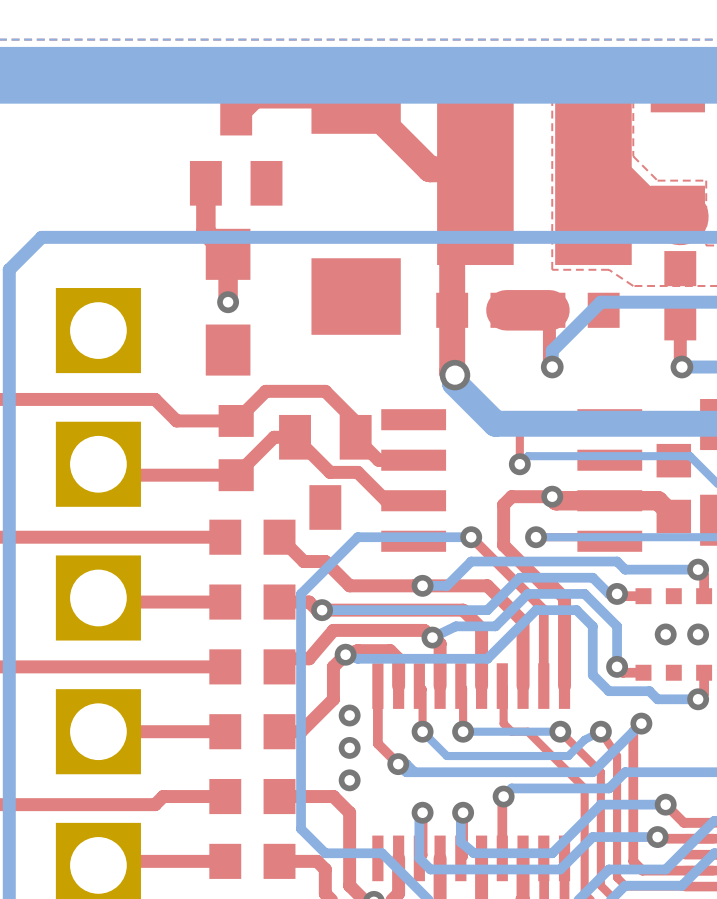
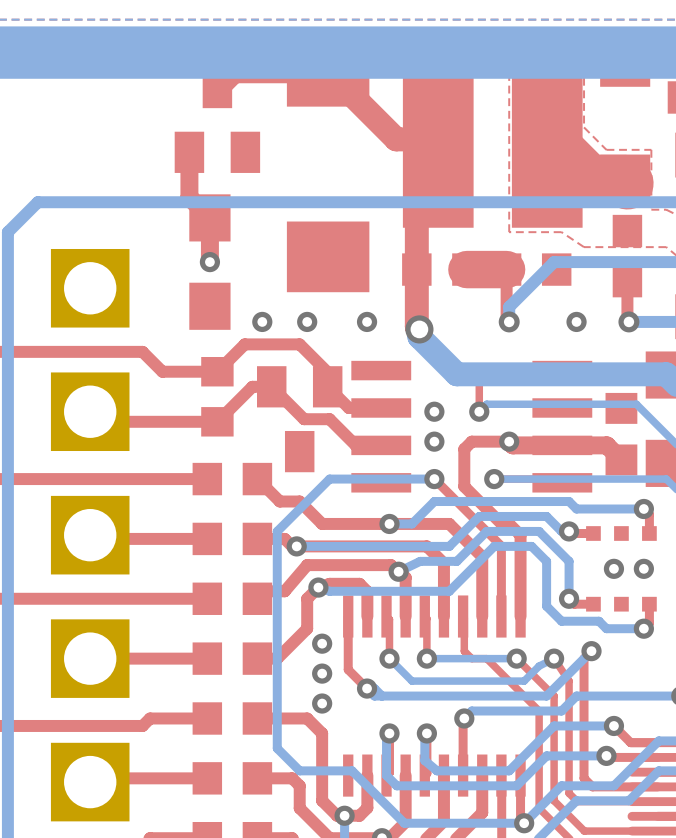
via: none -> (262, 321)
via: none -> (307, 321)
via: none -> (367, 321)
via: none -> (576, 321)
via: none -> (434, 411)
via: none -> (434, 441)

